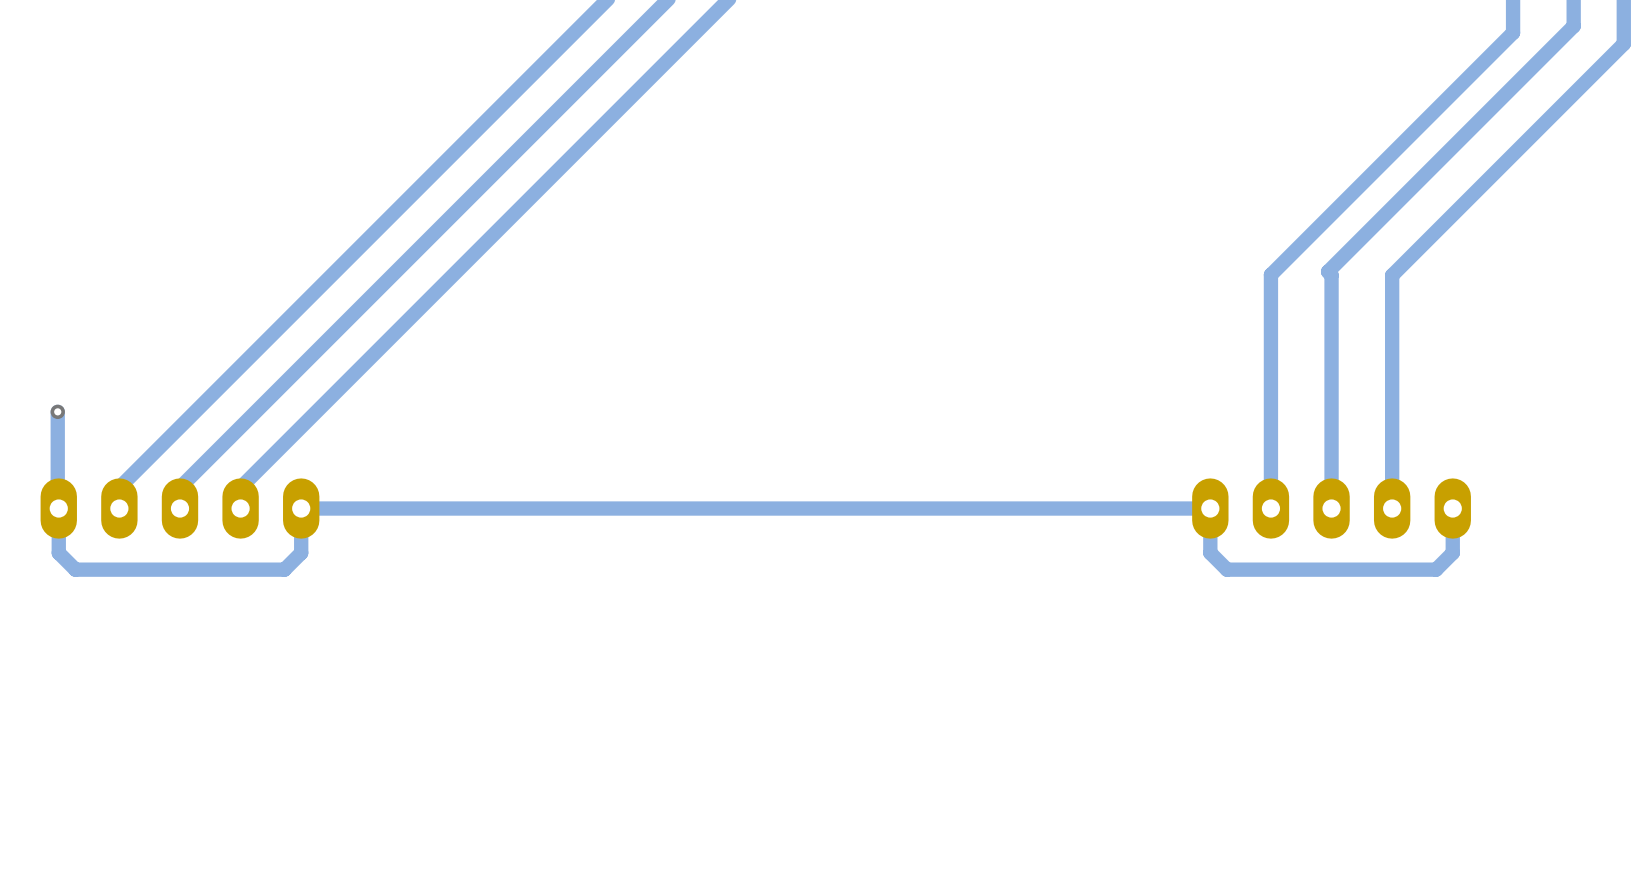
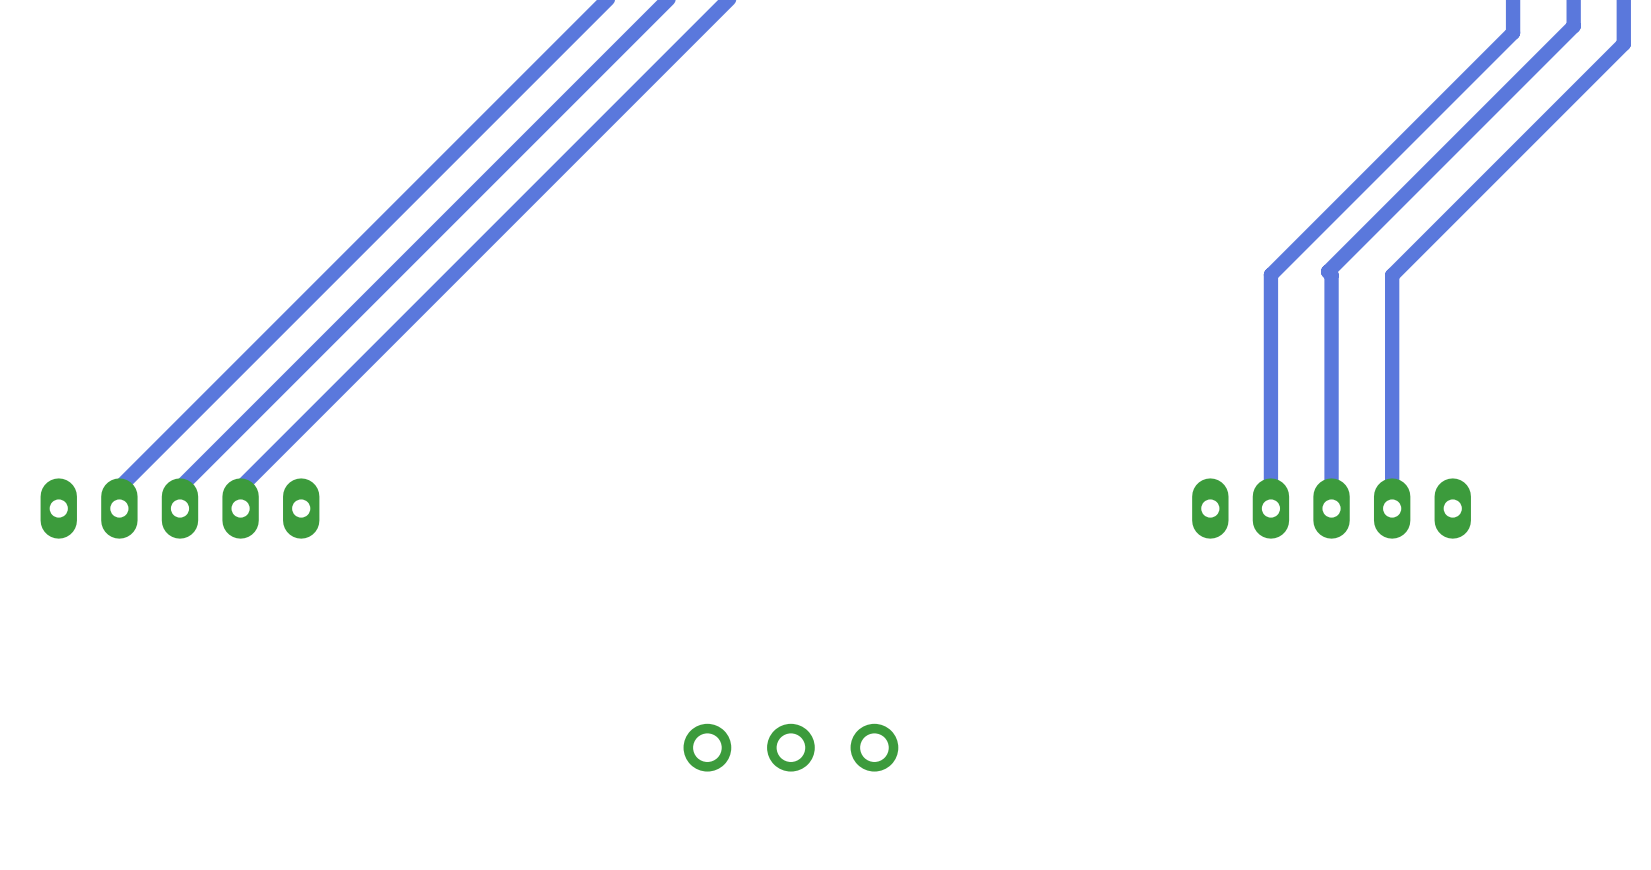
track: (57, 411) (58, 552) (75, 569) (284, 569) (301, 552) (301, 508) (1210, 508) (1210, 552) (1227, 569) (1436, 569) (1452, 552) (1452, 508) -> none
via: (57, 411) -> none
part: none -> (790, 747)

